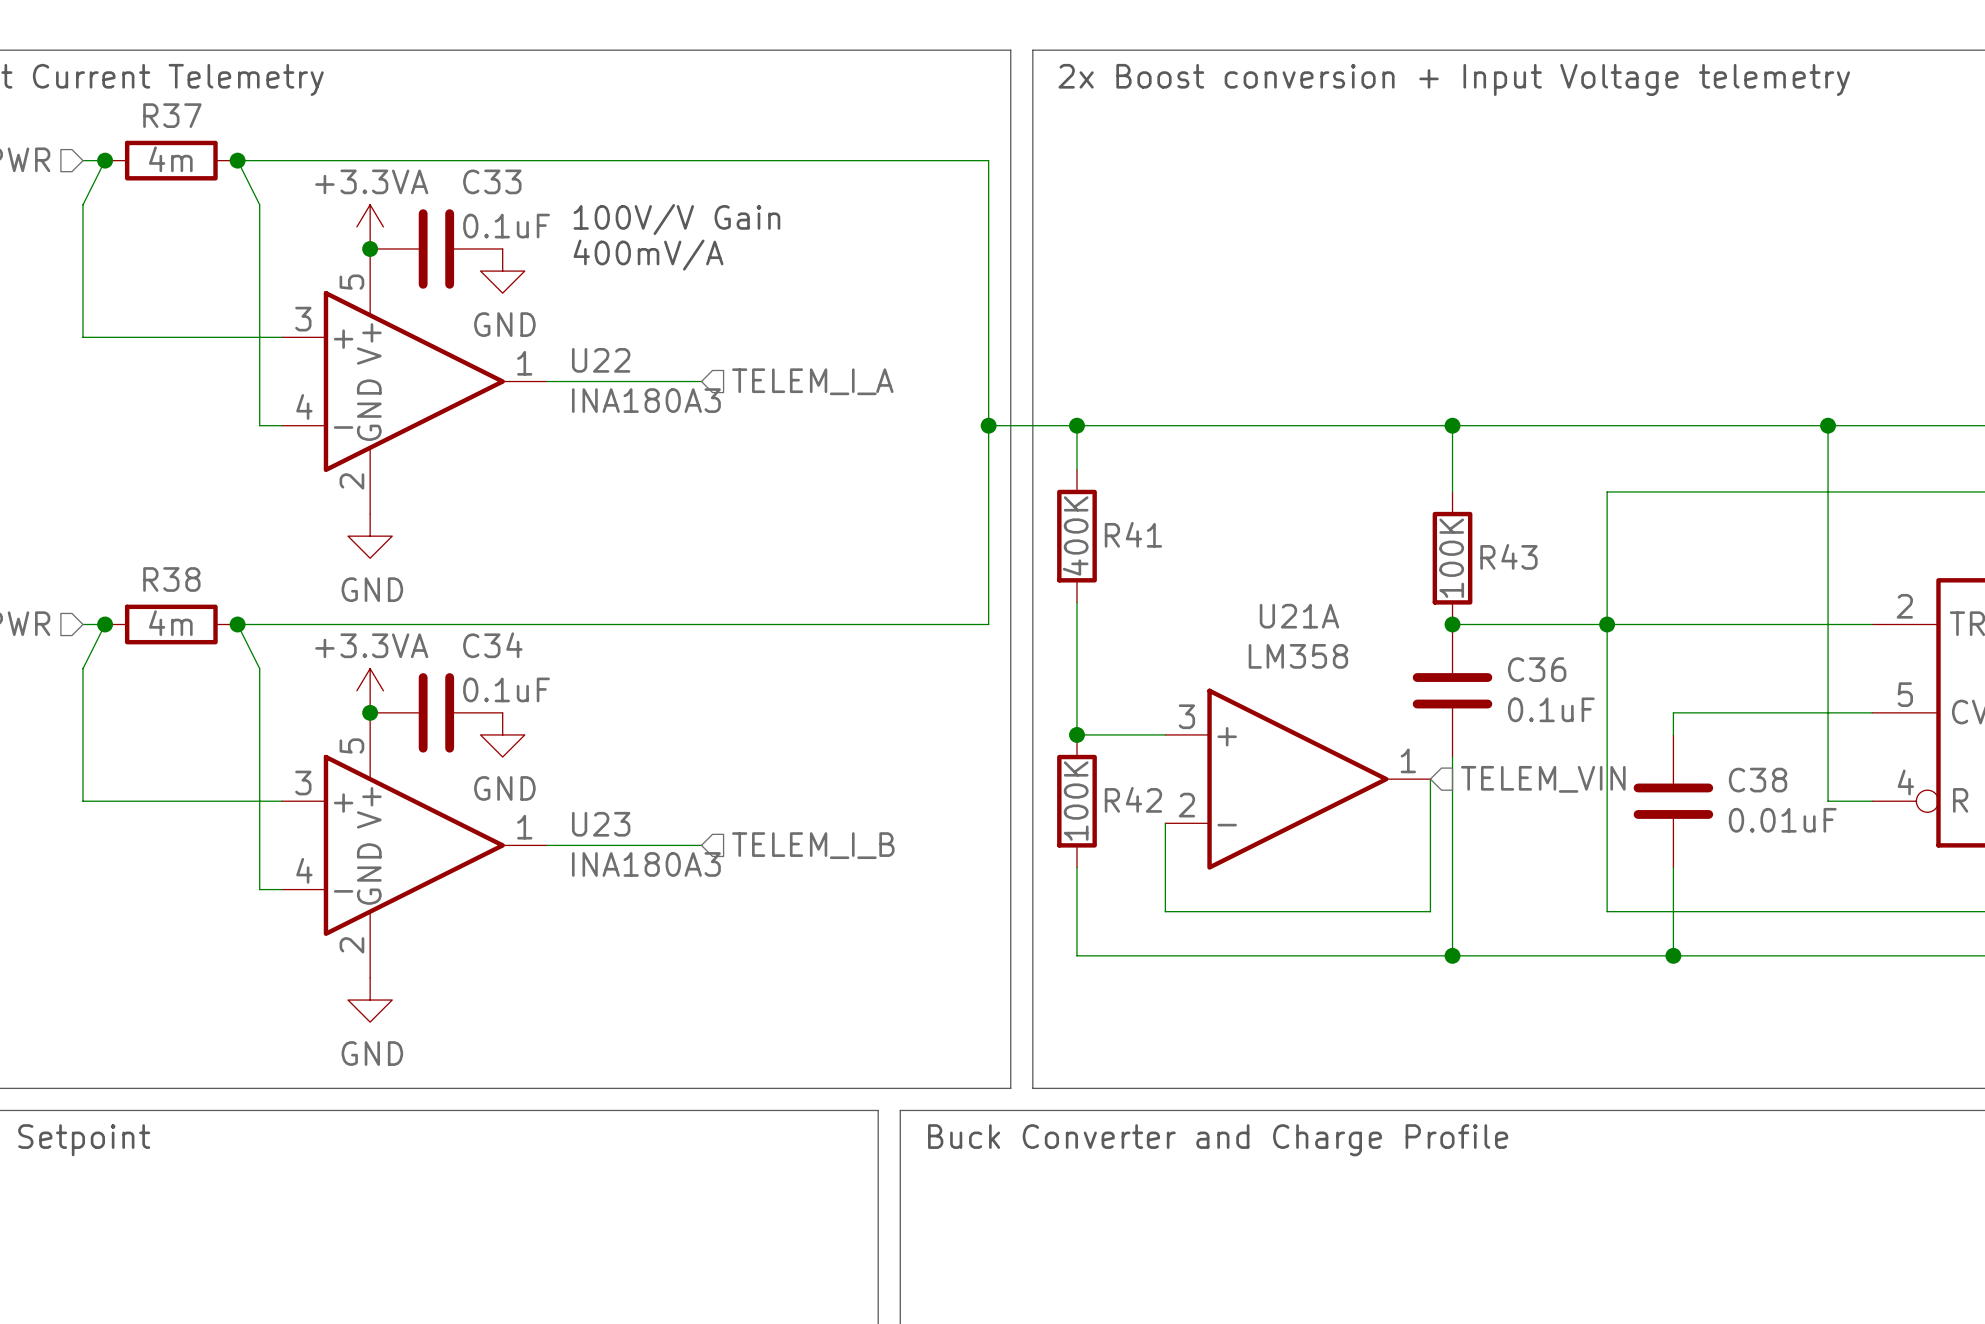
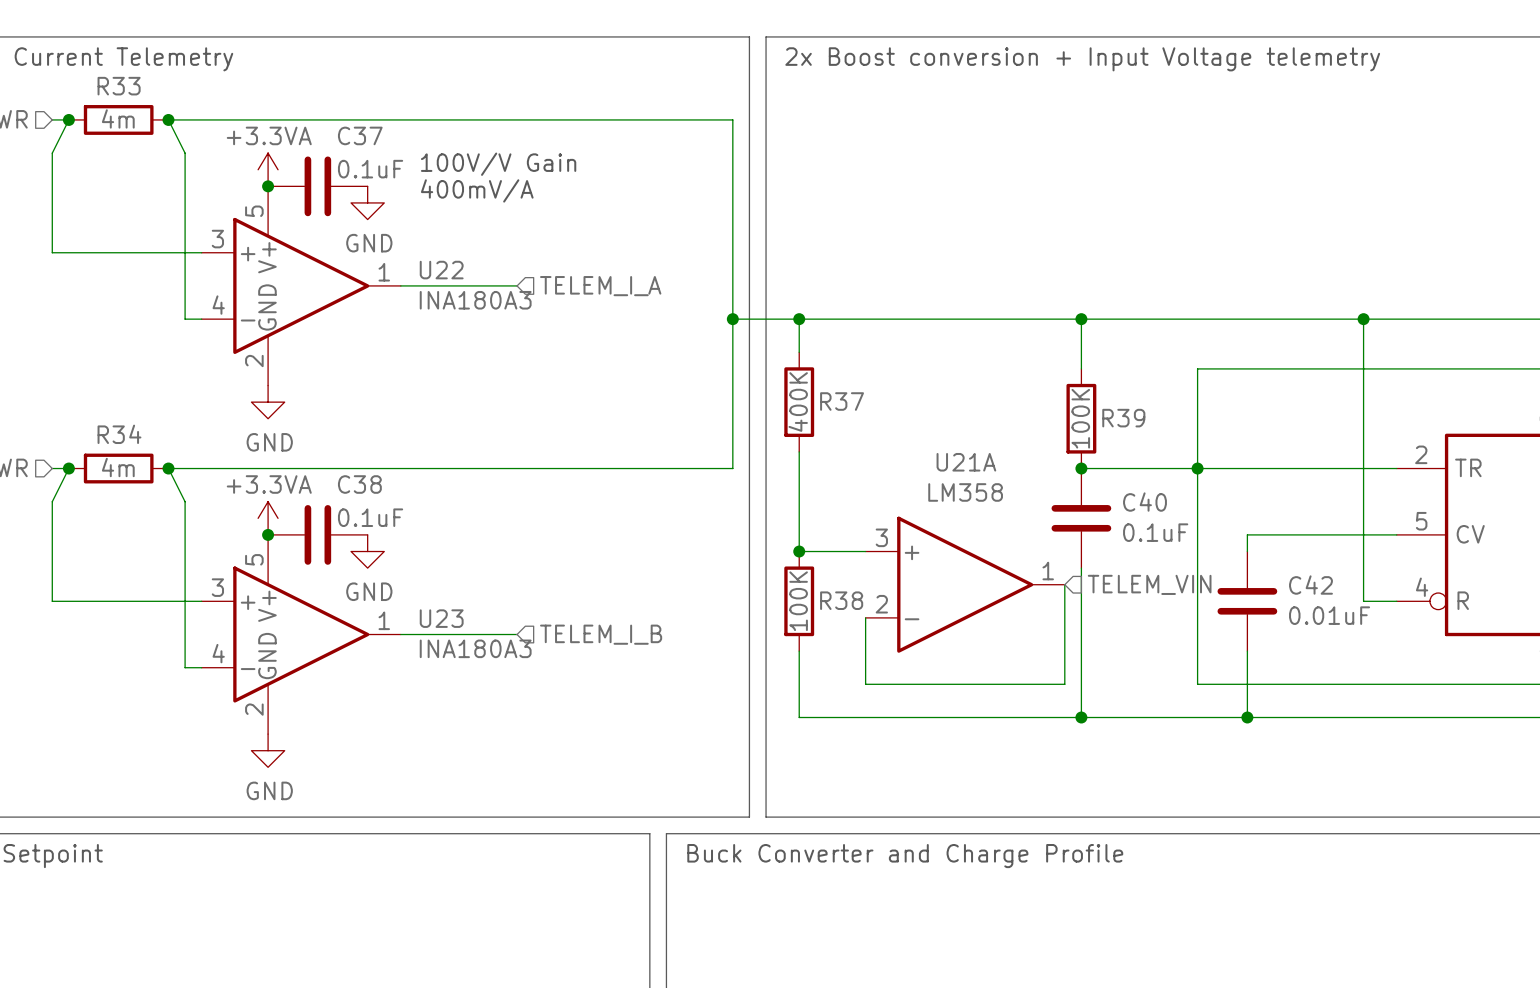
R37 name: R37 (172, 115) -> R33 (119, 86)
C33 name: C33 (492, 181) -> C37 (360, 135)
R41 name: R41 (1133, 534) -> R37 (842, 401)
R43 name: R43 (1508, 556) -> R39 (1123, 418)
R38 name: R38 (171, 579) -> R34 (119, 434)
C34 name: C34 (492, 645) -> C38 (359, 484)
C36 name: C36 (1537, 669) -> C40 (1144, 502)
C38 name: C38 (1758, 780) -> C42 (1310, 585)
R42 name: R42 (1133, 799) -> R38 (841, 600)

